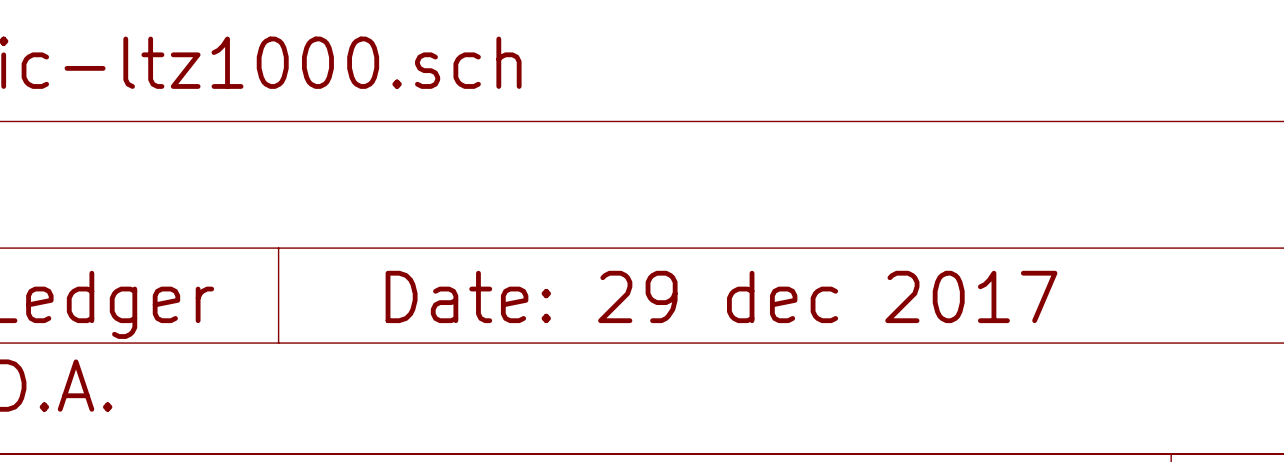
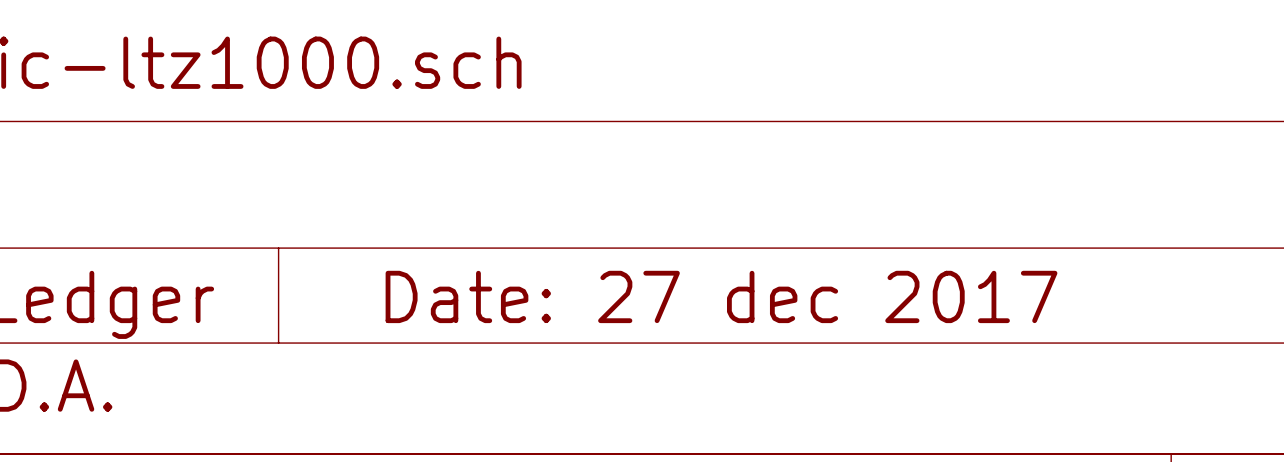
title block: Date: 29 dec 2017 (721, 296) -> Date: 27 dec 2017 (721, 296)

